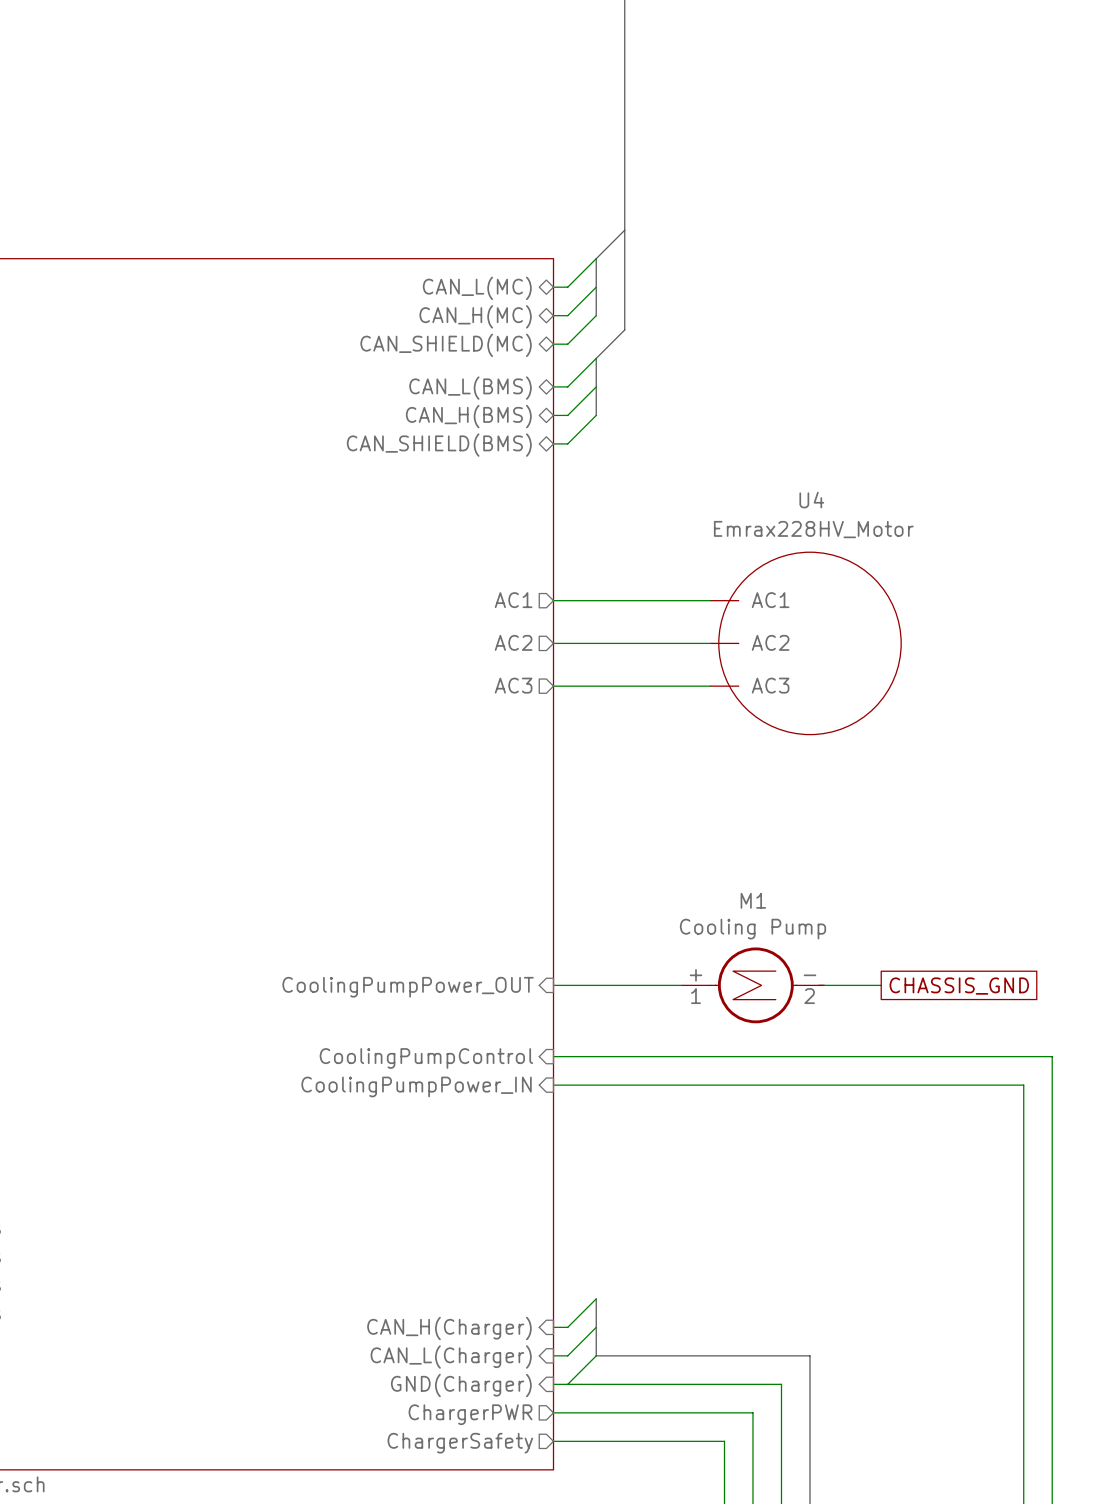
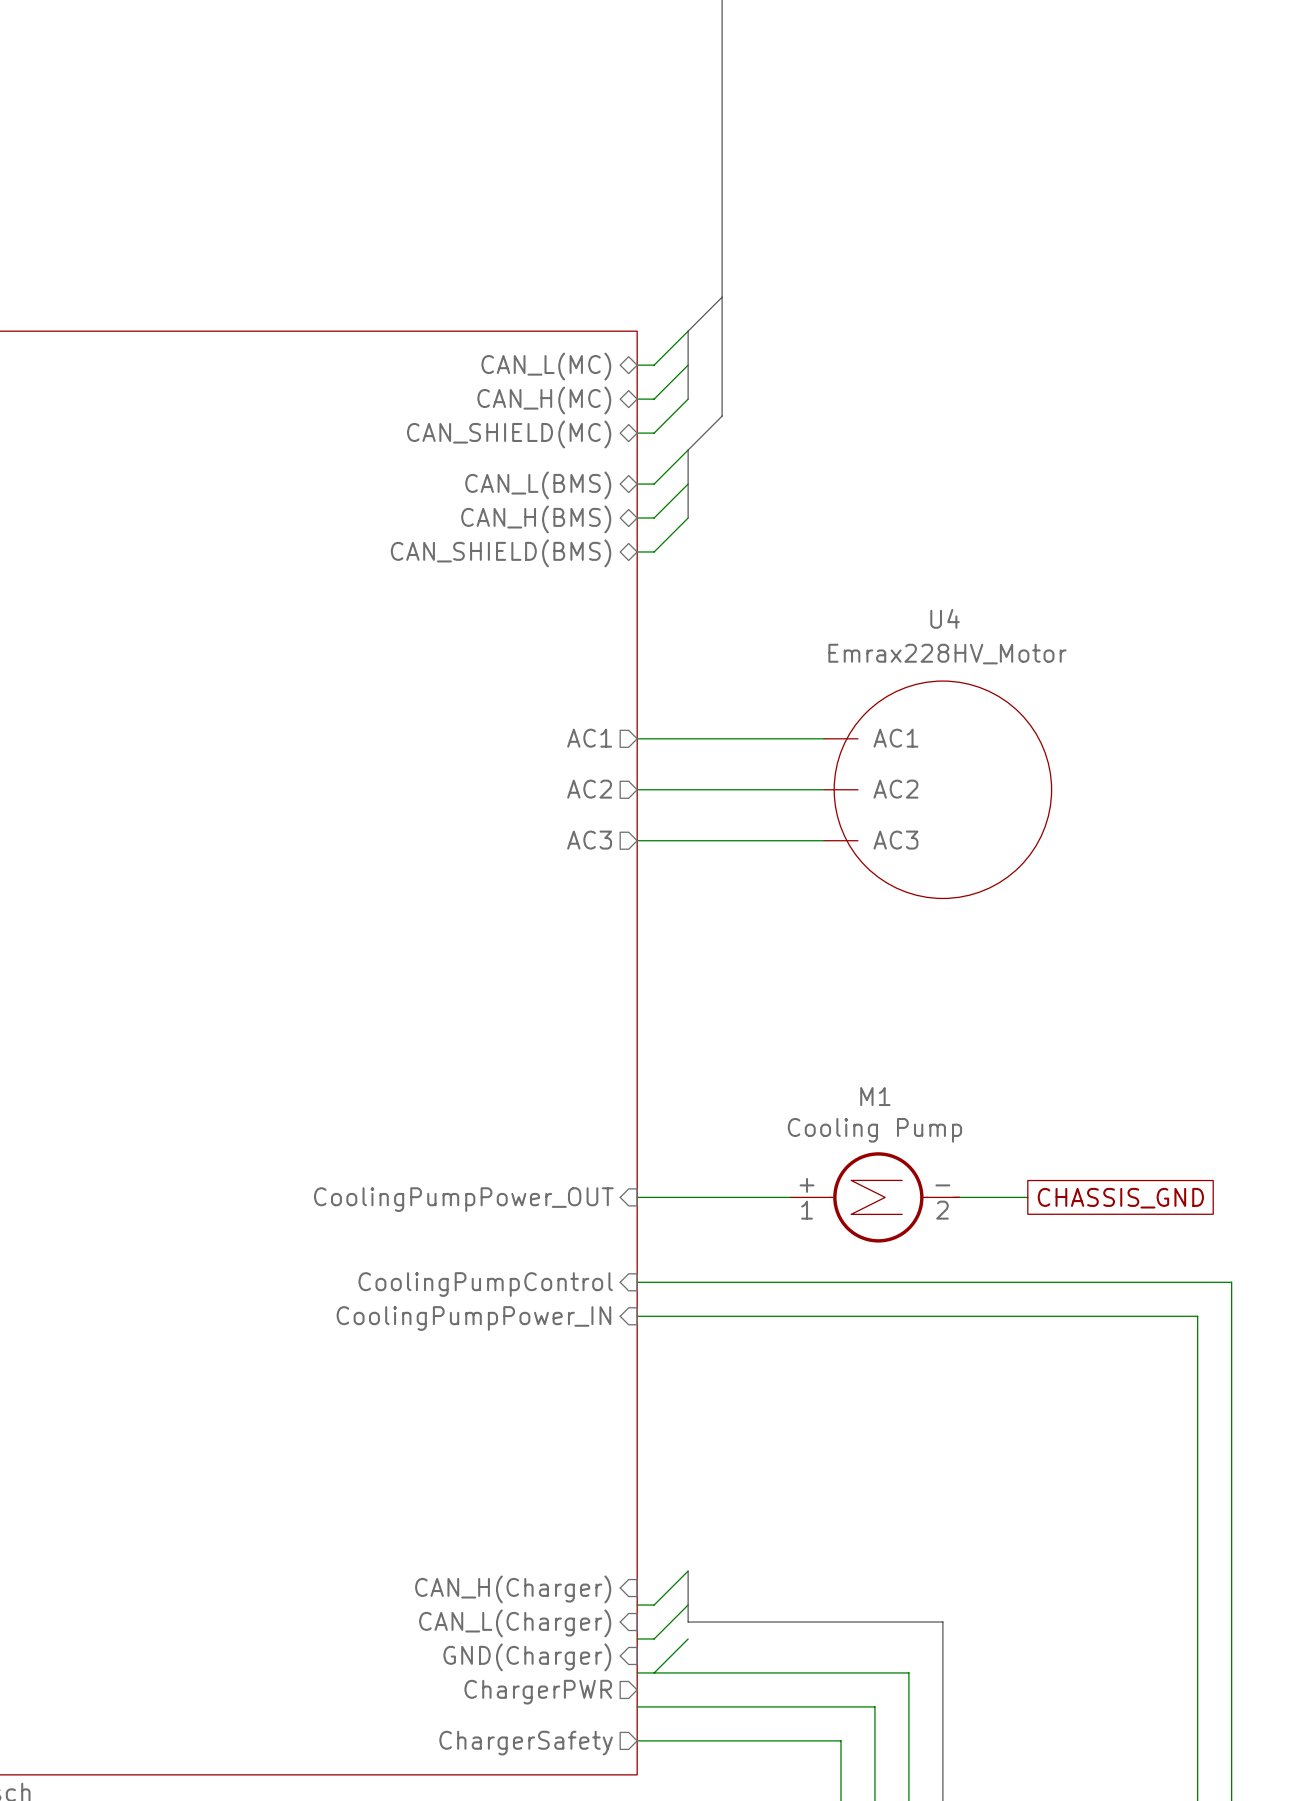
sheet pin position: CAN_H(Charger) (449, 1328) -> CAN_H(Charger) (513, 1589)
bus: (596, 1341) (596, 1355) (809, 1355) -> (688, 1622) (942, 1622) (942, 1638)
sheet pin position: CAN_L(Charger) (451, 1357) -> CAN_L(Charger) (515, 1623)
sheet pin position: GND(Charger) (461, 1385) -> GND(Charger) (527, 1657)
sheet pin position: ChargerPWR (470, 1414) -> ChargerPWR (538, 1692)

